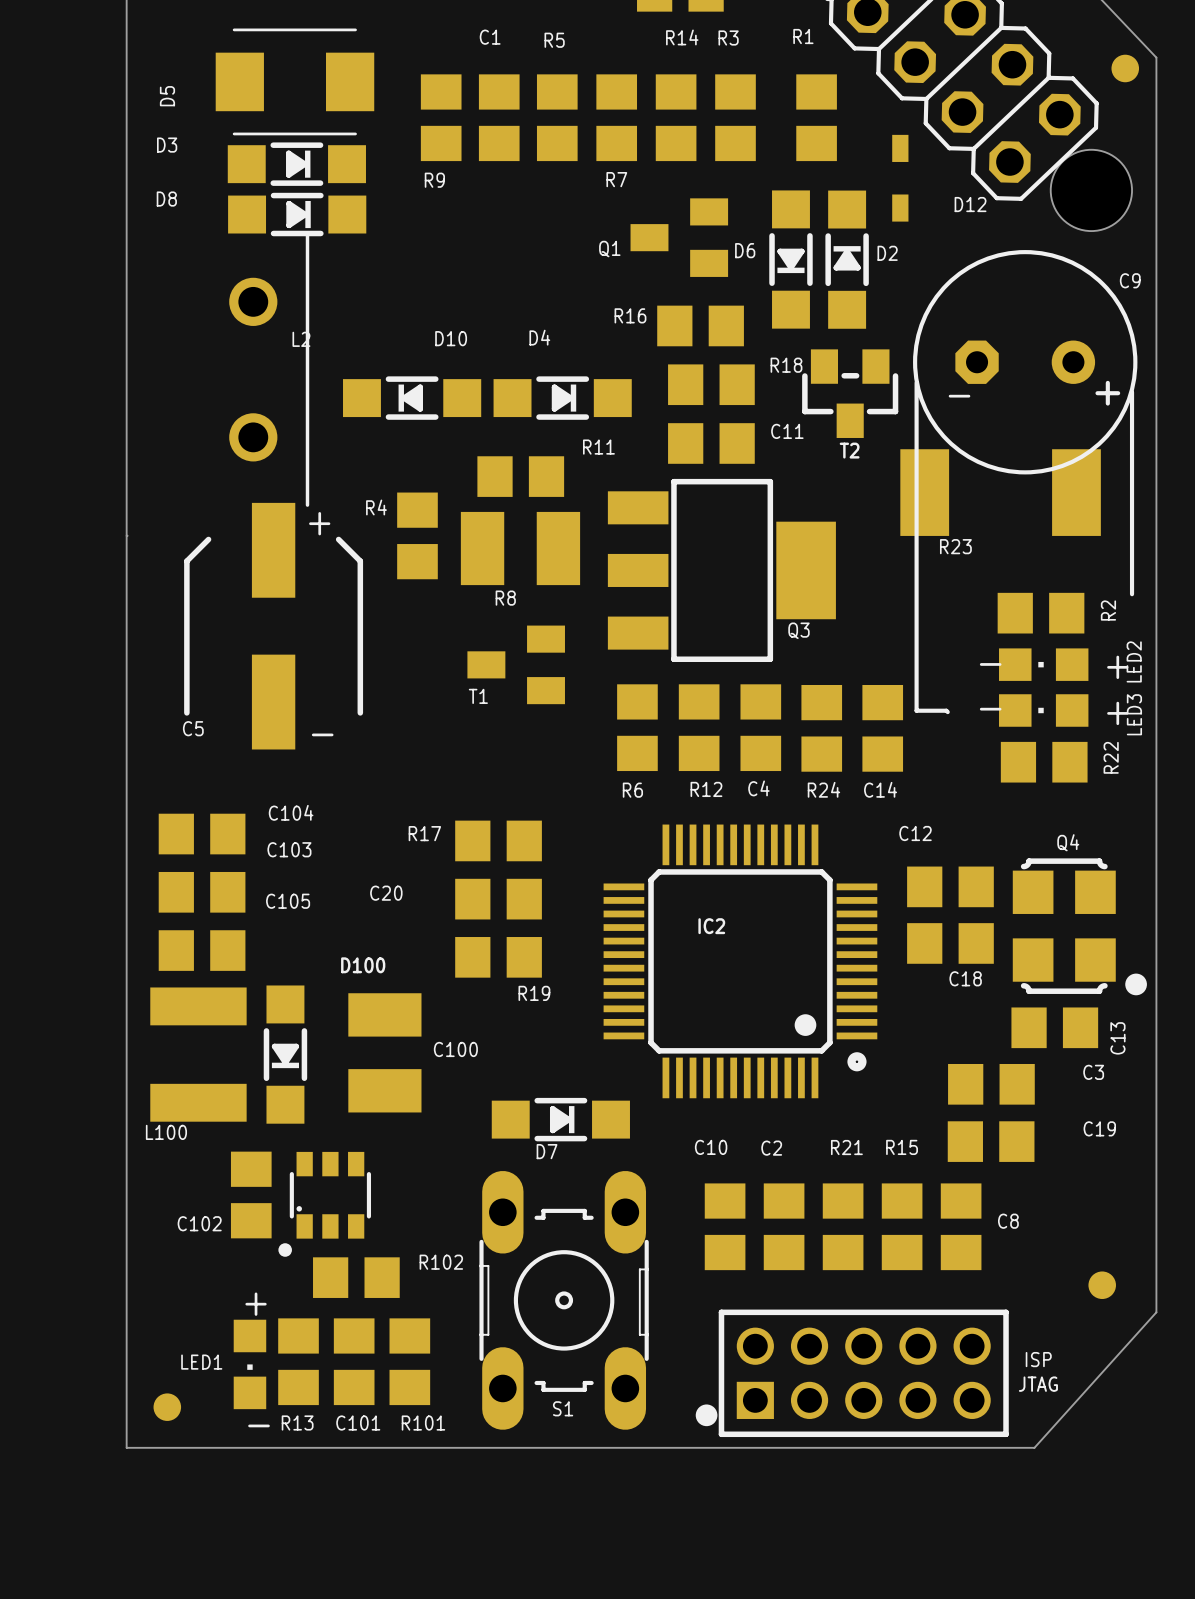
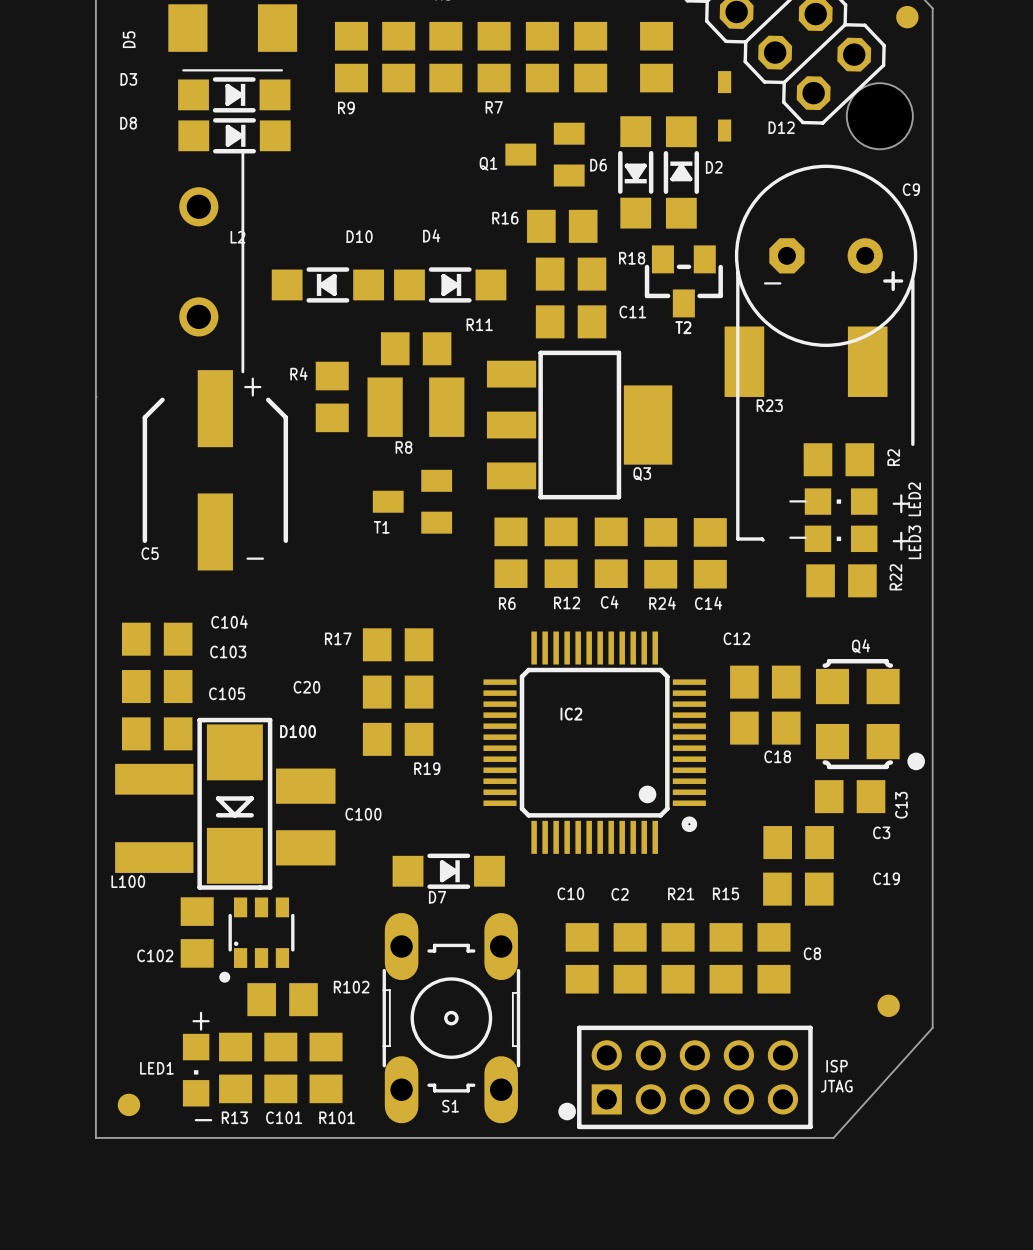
D100 footprint: [263, 985, 308, 1124] -> [197, 717, 273, 890]

